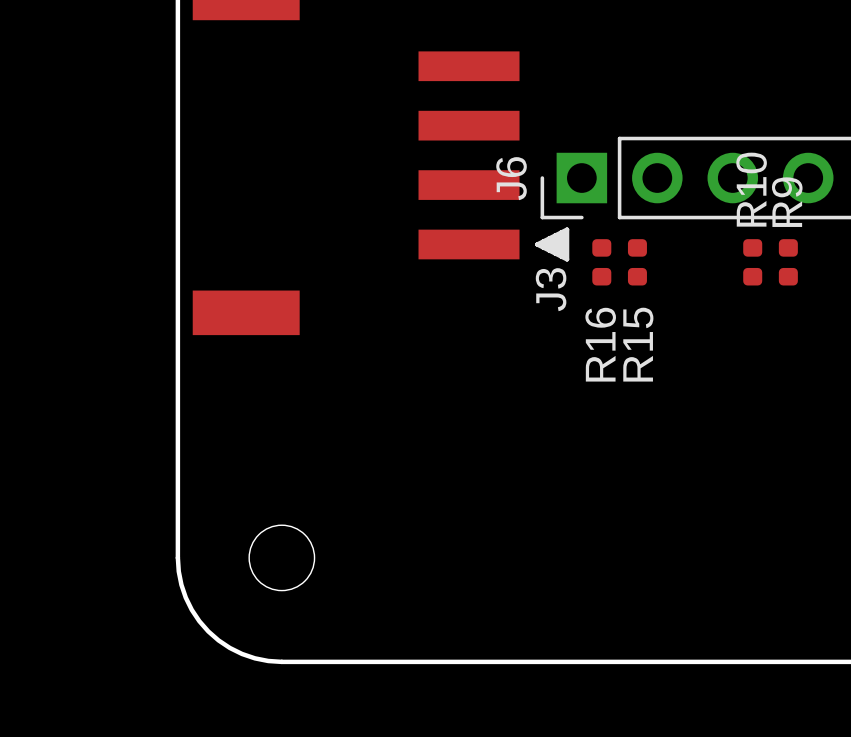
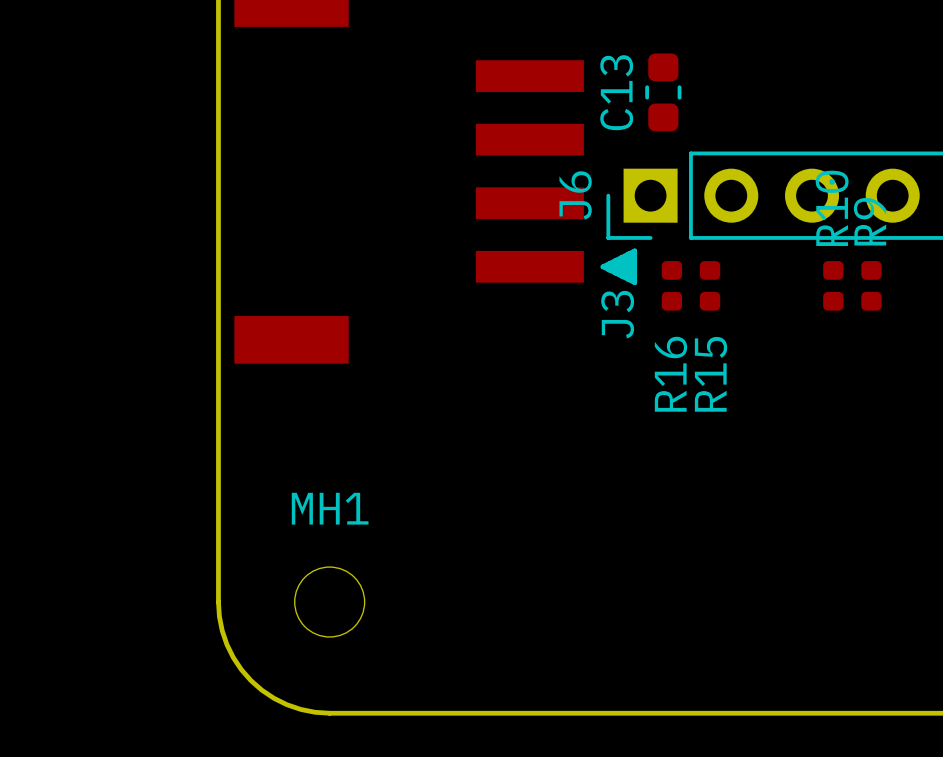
C13: none -> (663, 92)
MH1 name: none -> MH1 (330, 508)

